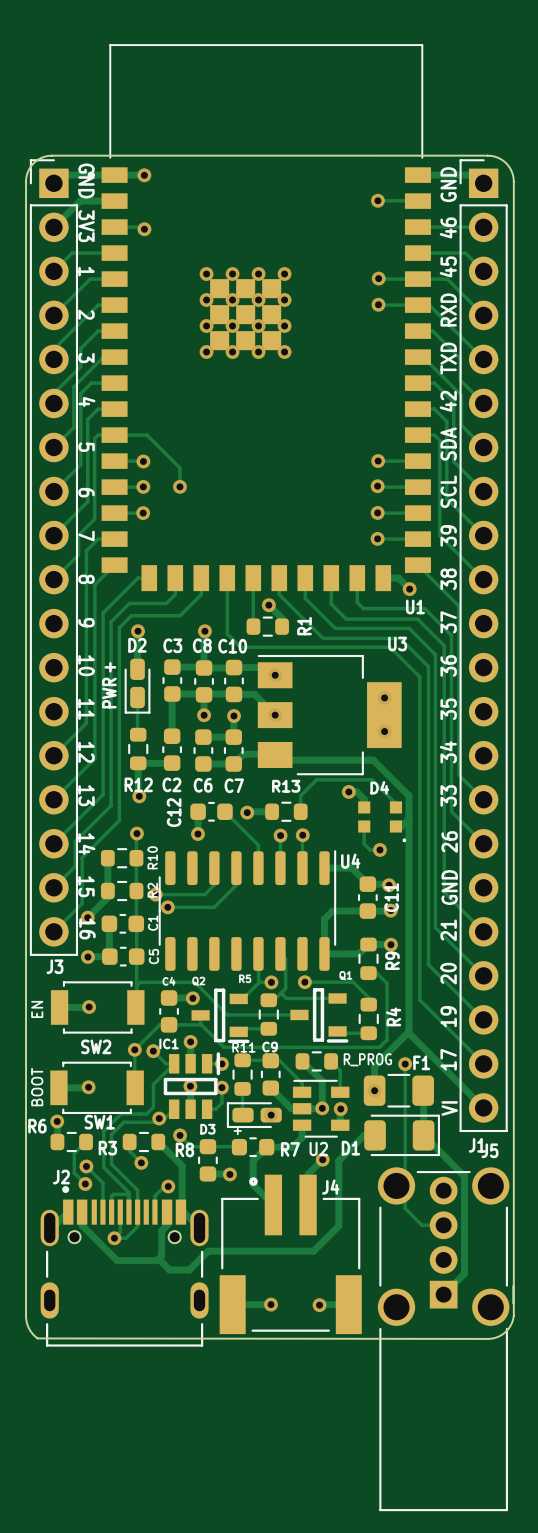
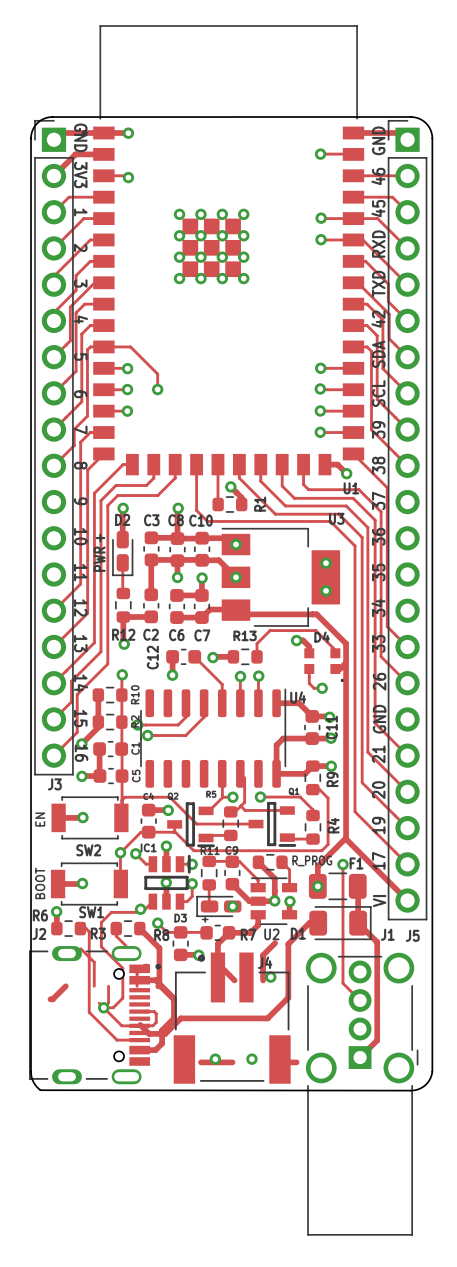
track: (174, 1063) (153, 1084) (153, 1107) (146, 1113) (121, 1114) (103, 1131) (103, 1167) (129, 1192) (128, 1212) -> none
track: (86, 1141) (74, 1153) (74, 1172) (85, 1183) -> (80, 928) (86, 928) (89, 931) (89, 1012) (117, 1040) (139, 1040)
track: (446, 1158) (464, 1176) (464, 1273) (443, 1294) -> (377, 942) (377, 1040) (360, 1057)
via position: (322, 1159) -> (270, 977)
via: (141, 1162) -> none
via: (86, 1166) -> none
via: (85, 1183) -> none
via: (168, 1186) -> none
track: (128, 1196) (127, 1194) (113, 1194) (111, 1196) (111, 1212) -> none
track: none -> (139, 980) (155, 980) (173, 998) (173, 1018) (162, 1030) (162, 1043) (155, 1050) (139, 1050)
track: (405, 1208) (422, 1225) (443, 1225) -> (342, 983) (360, 1000)
track: (82, 1212) (82, 1225) (117, 1260) (157, 1260) (161, 1256) (161, 1230) (167, 1225) (167, 1212) -> none
track: none -> (99, 1003) (121, 1025) (152, 1025) (156, 1022) (156, 1013) (154, 1011) (139, 1011)
J4 position: (290, 1254) -> (232, 1018)
J2 rotation: 0° (124, 1266) -> 90° clockwise (95, 1015)
via: none -> (215, 1059)
via: none -> (251, 1059)
via: (271, 1304) -> none
via: (319, 1305) -> none
J1 position: (446, 1339) -> (362, 1094)

